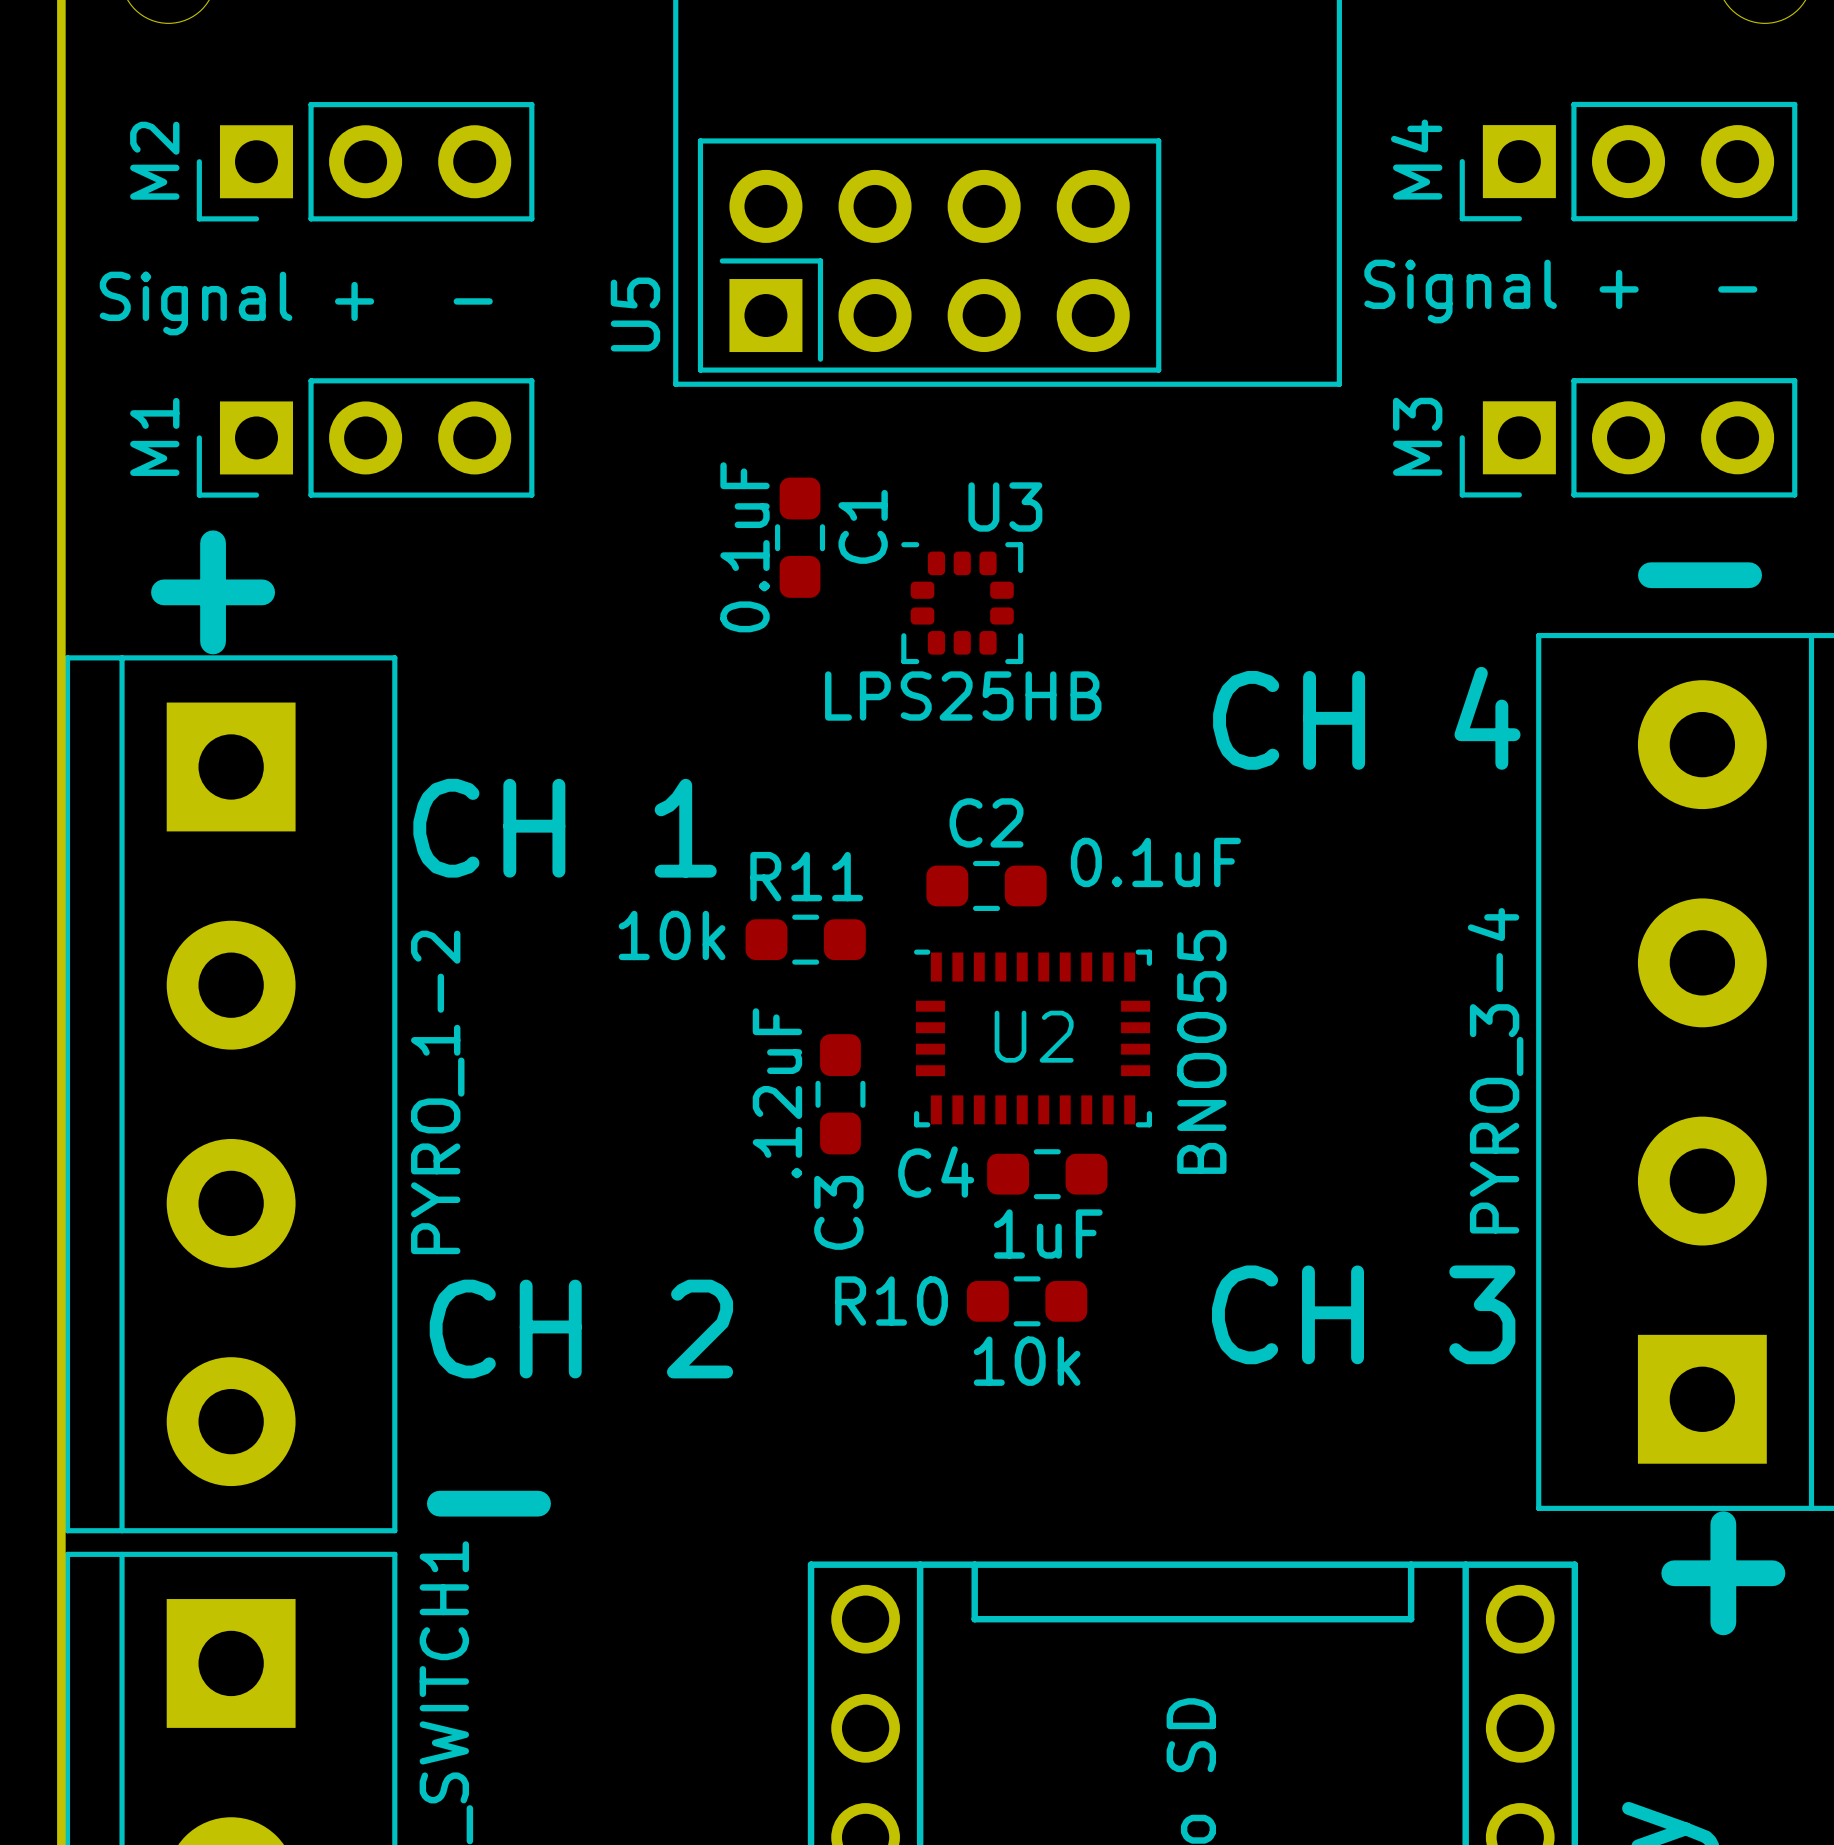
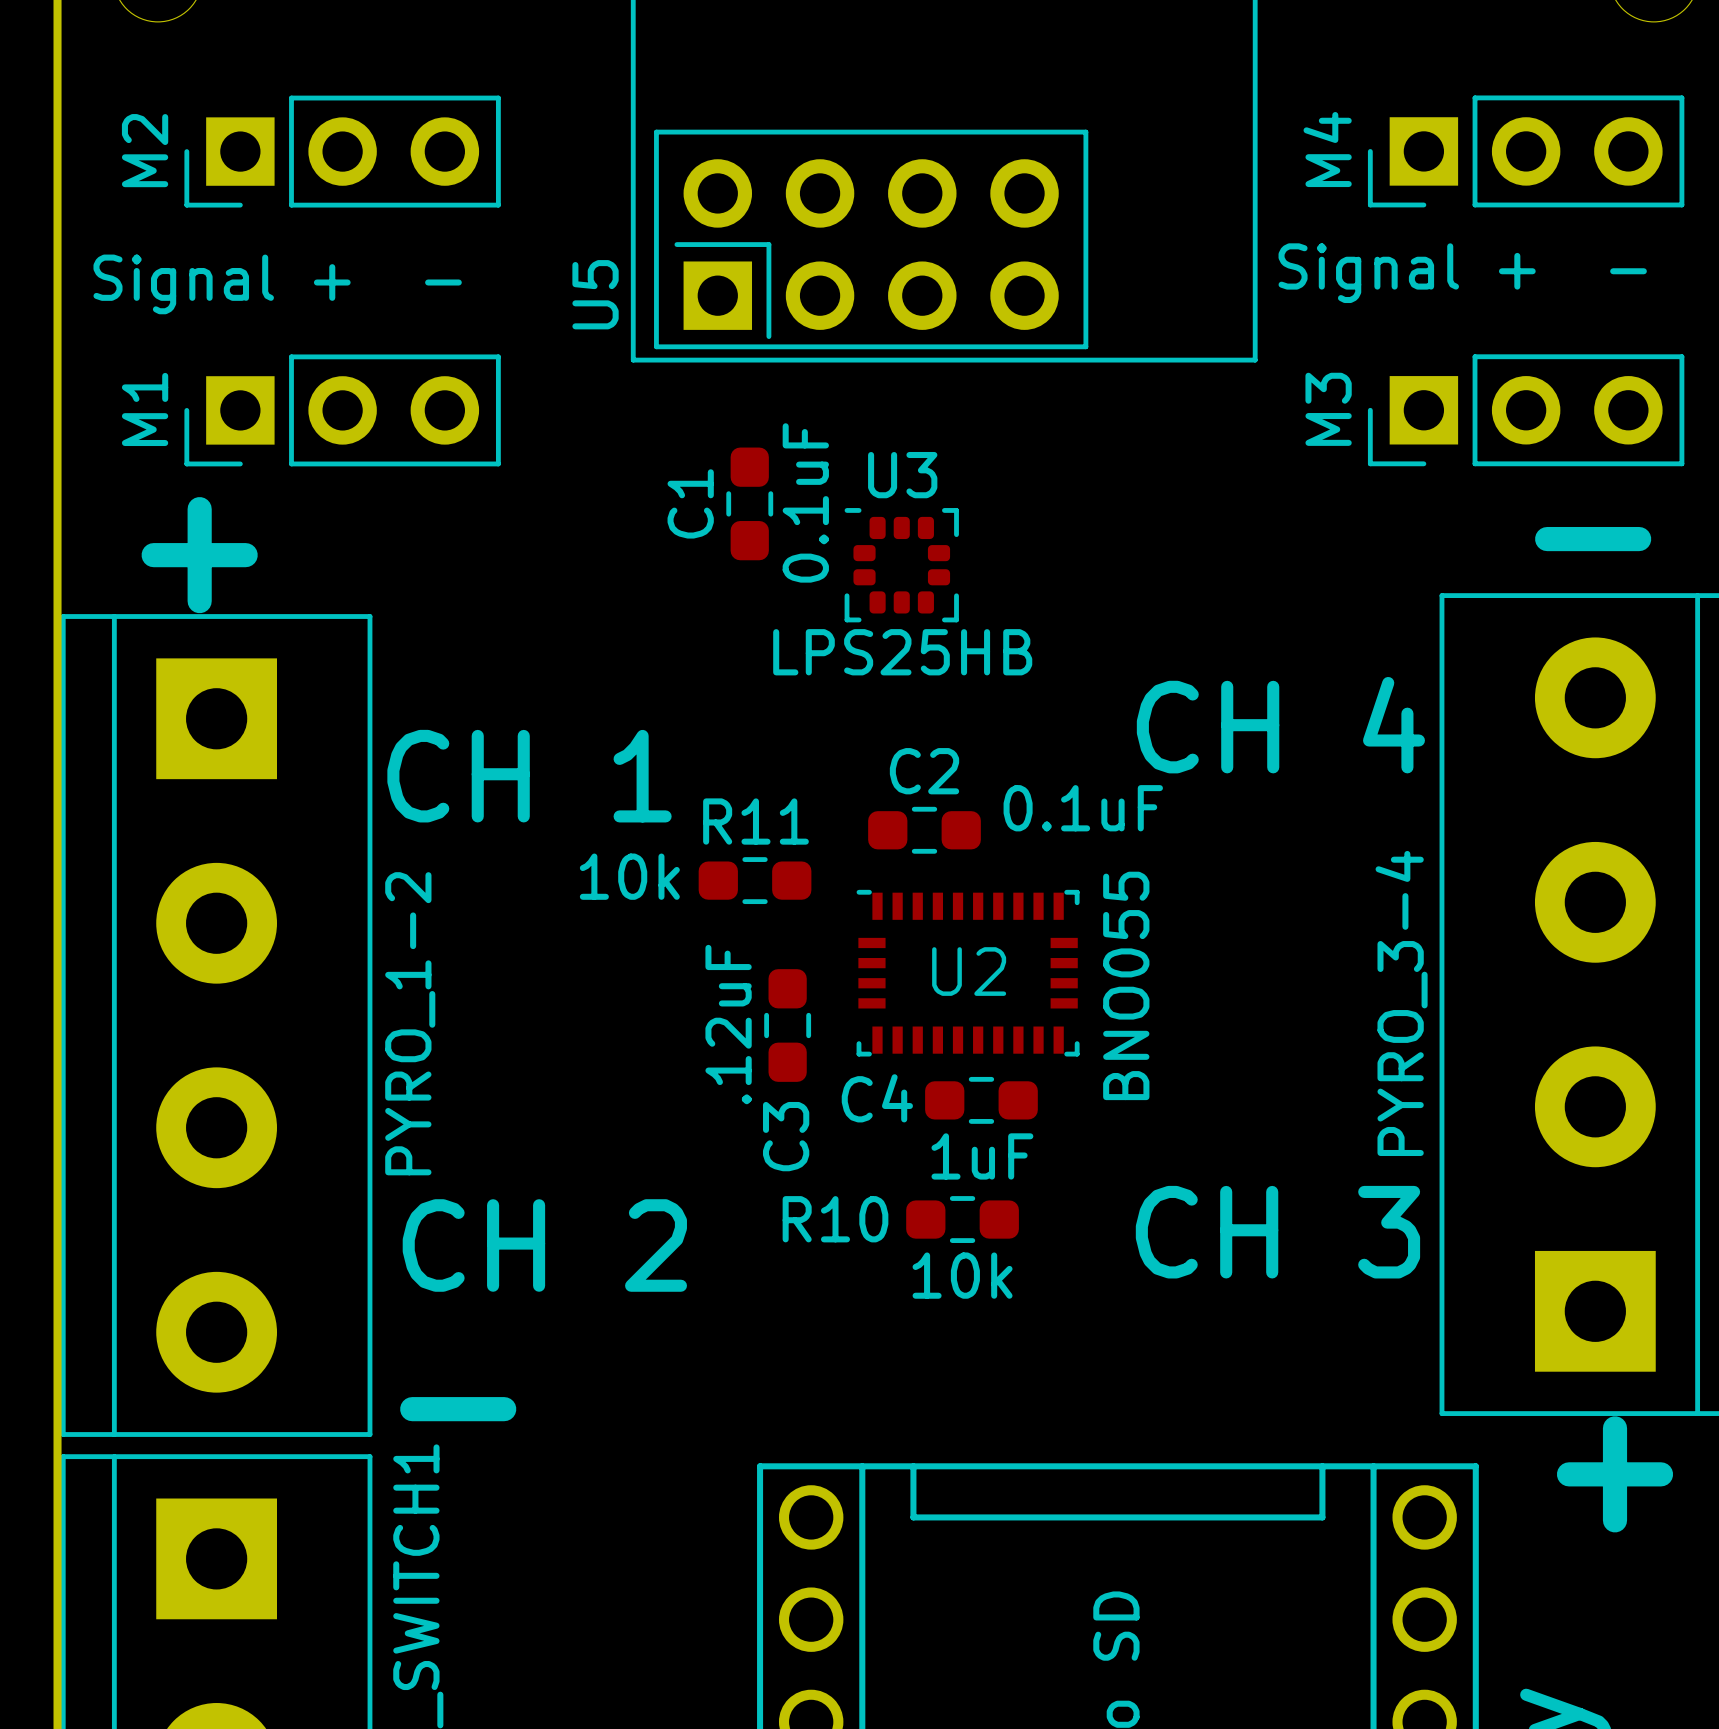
U3 name position: U3 (1005, 507) -> U3 (902, 475)
C1 name position: C1 (863, 526) -> C1 (690, 503)
C1 value position: 0.1uF (745, 547) -> 0.1uF (805, 502)
text position: CH 4 (1366, 718) -> CH 4 (1280, 725)

